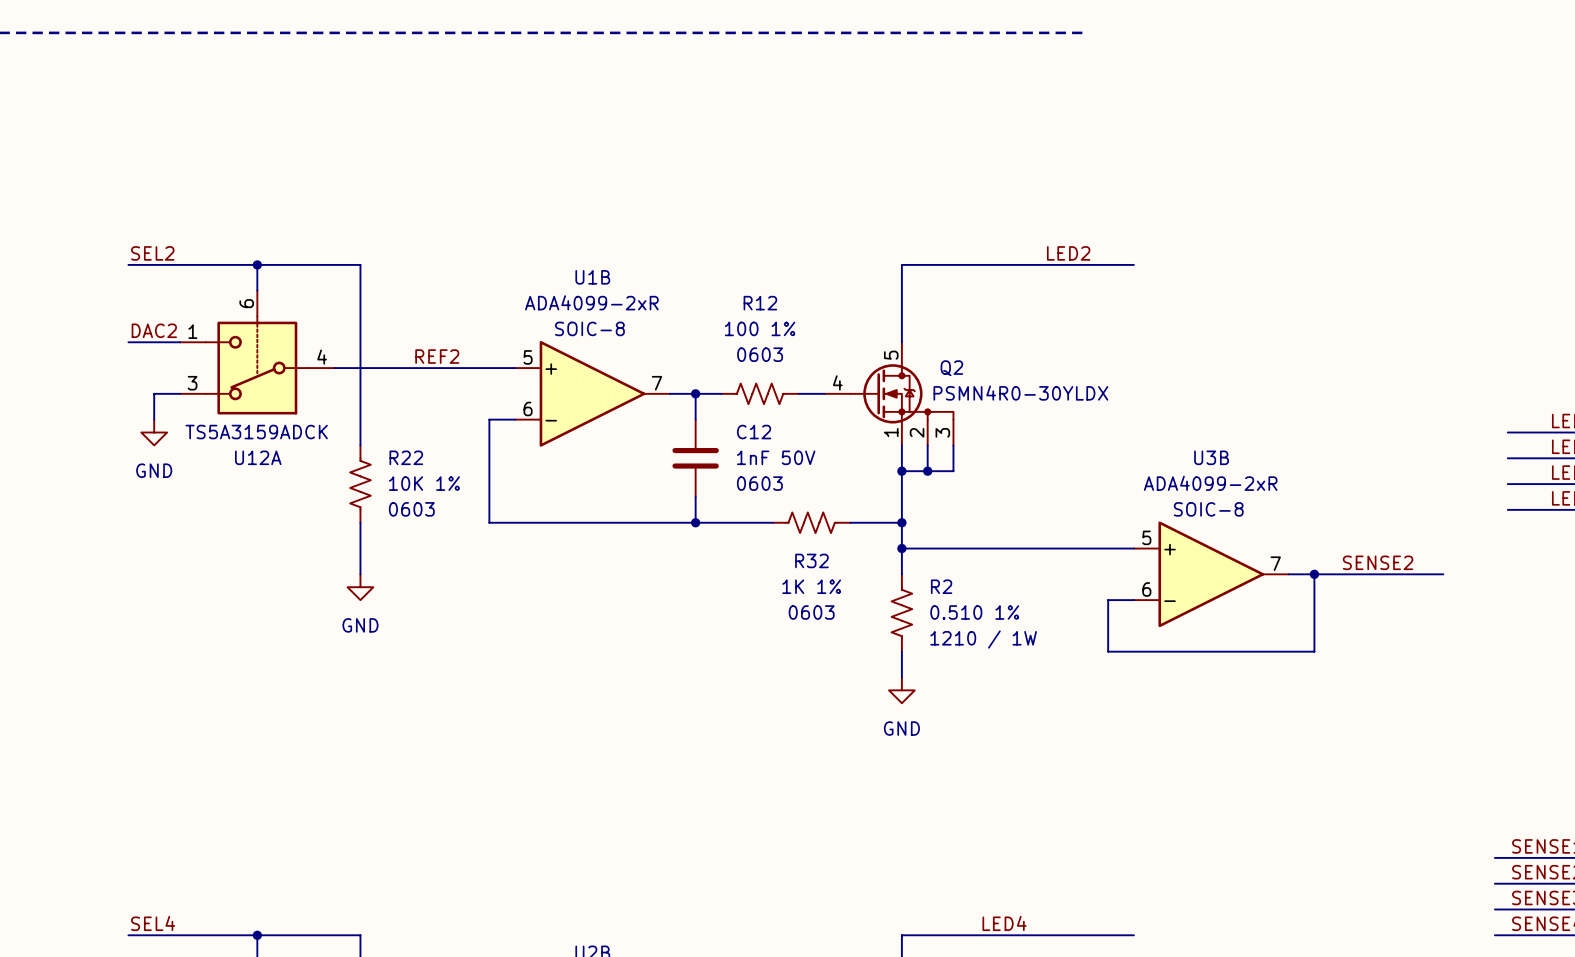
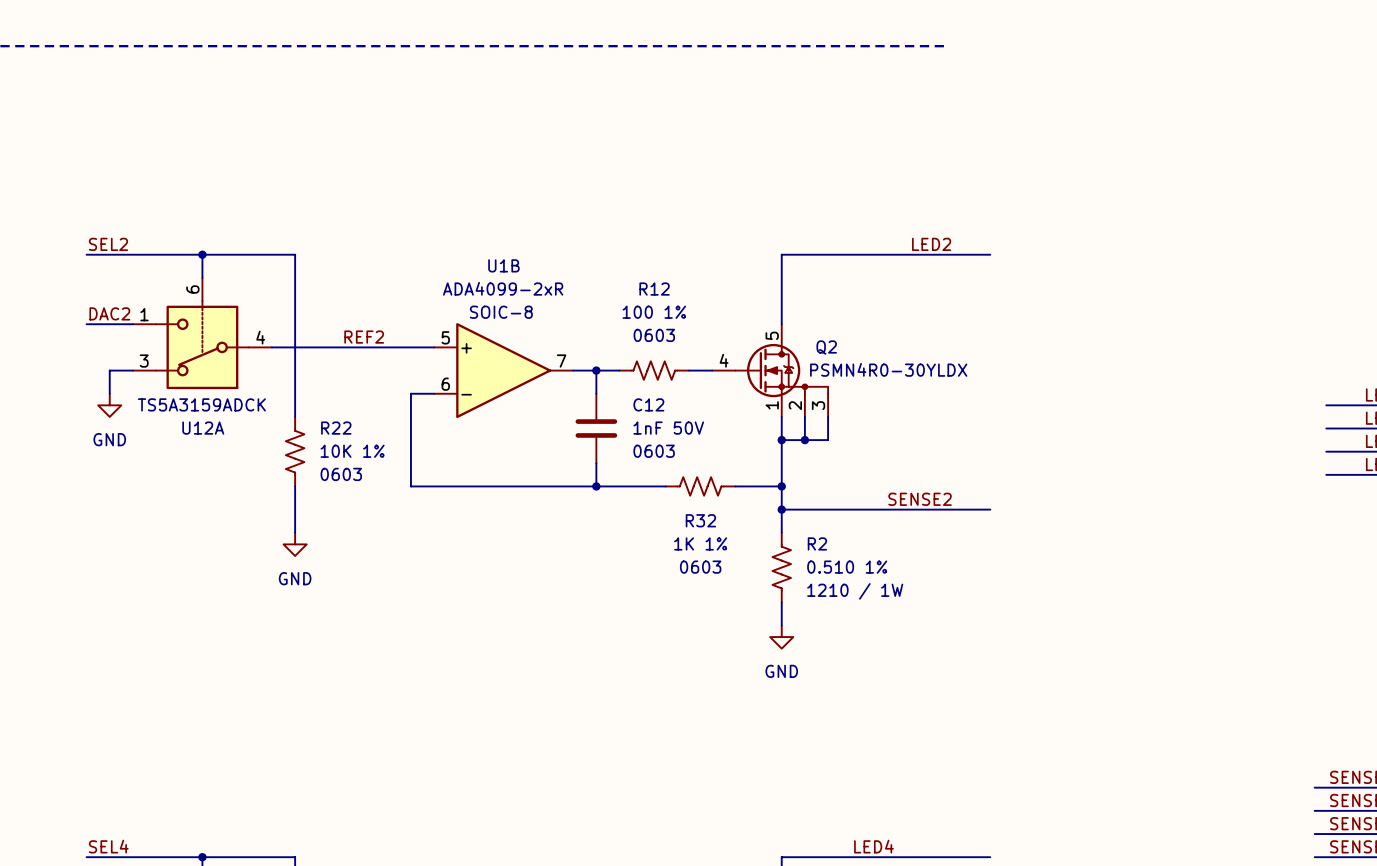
label: none -> SENSE2 (920, 499)
label: SENSE2 (1378, 562) -> none
U3B: ADA4099-2xR (1211, 574) -> none
wire: (1288, 574) (1443, 574) -> none
wire: (1314, 574) (1314, 651) (1108, 651) (1108, 600) (1133, 600) -> none
junction: (1314, 574) -> none

